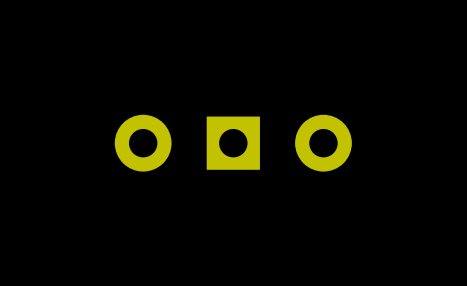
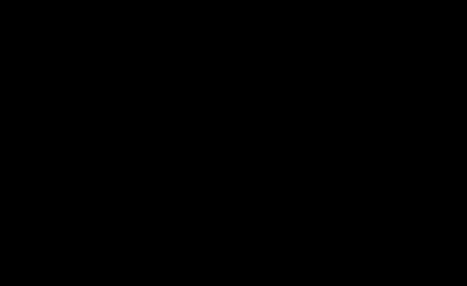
part: (233, 143) -> none

